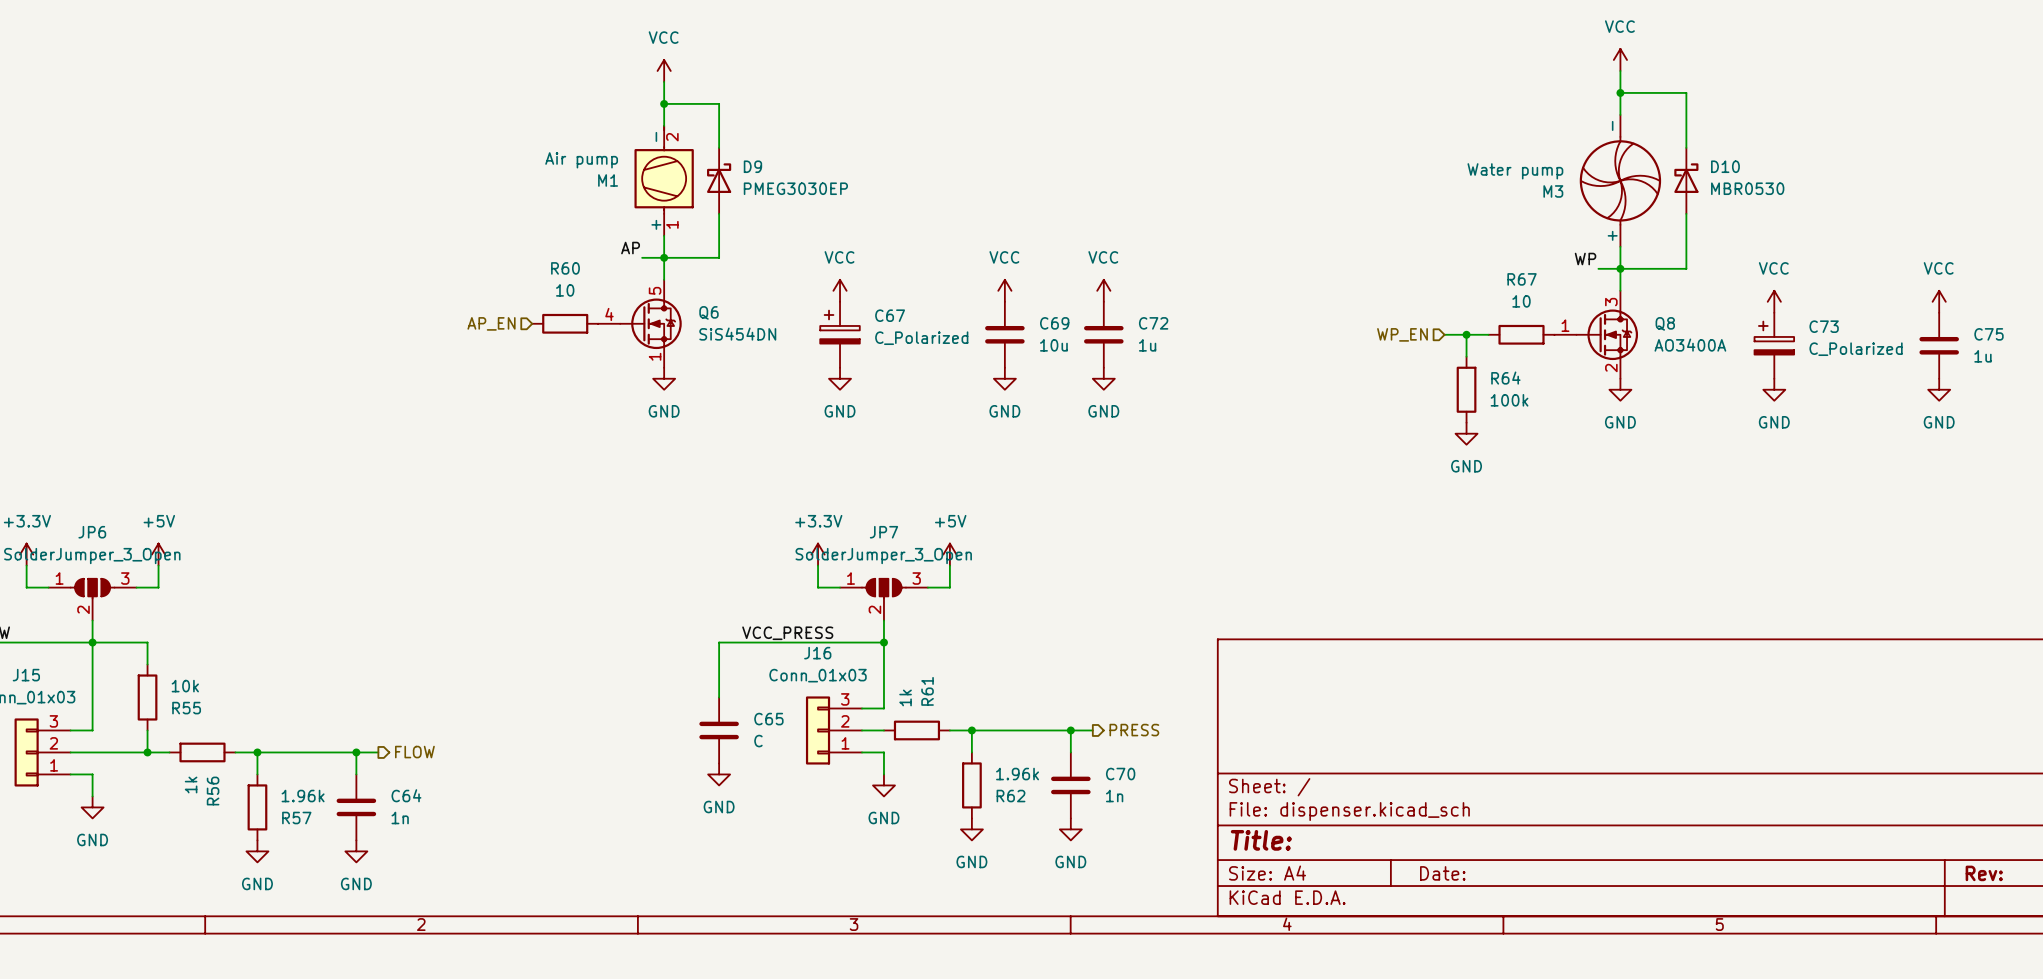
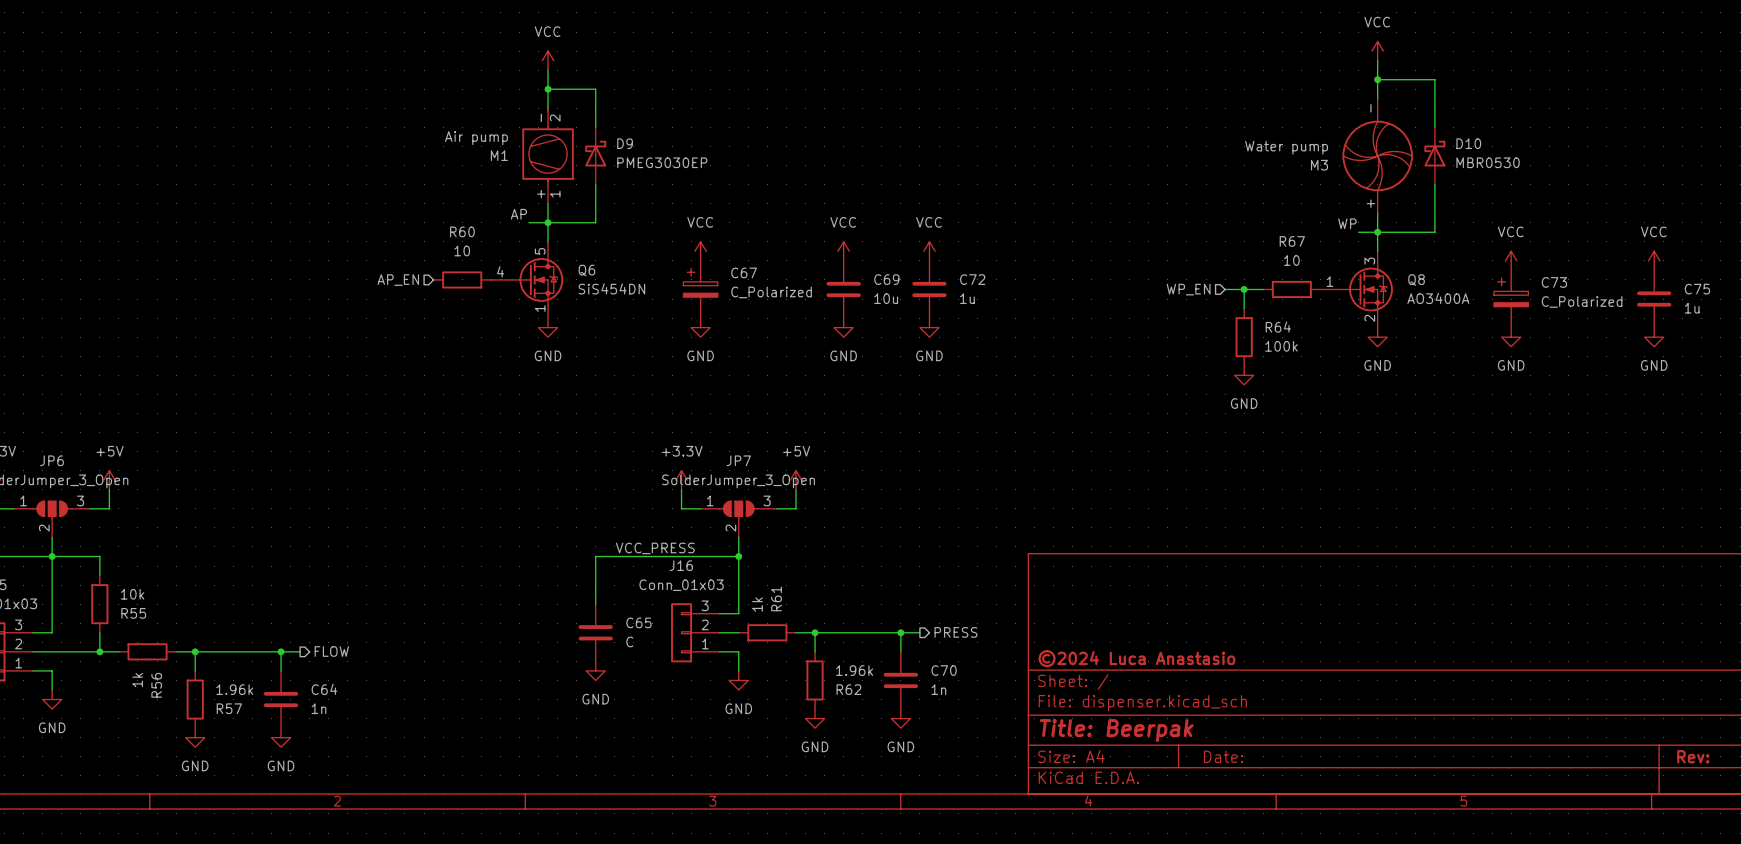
title block: none -> ©2024 Luca Anastasio (1136, 658)
title block: Title: (1261, 840) -> Title: Beerpak (1116, 730)

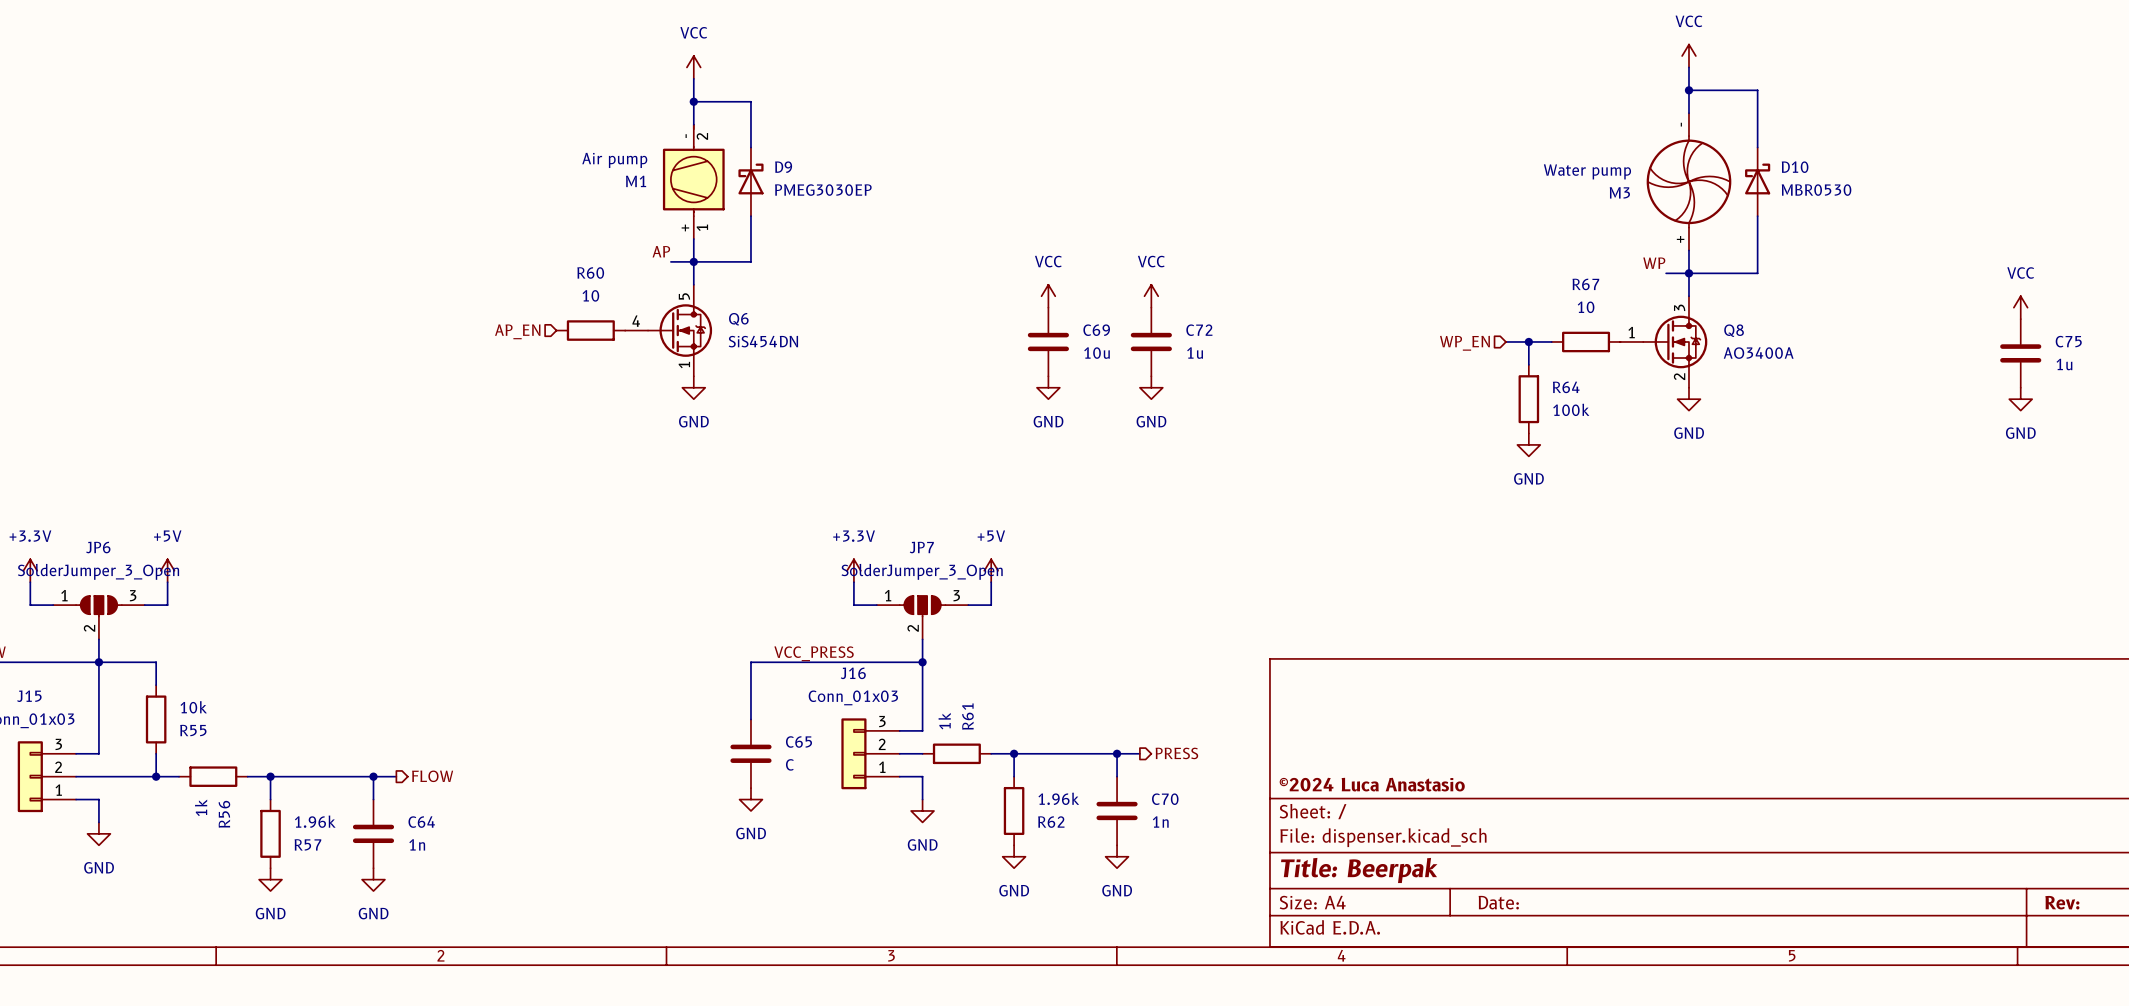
power symbol: VCC (700, 251) -> none
power symbol: VCC (1511, 260) -> none
C67: C_Polarized (700, 289) -> none
C73: C_Polarized (1511, 299) -> none
power symbol: GND (700, 327) -> none
power symbol: GND (1511, 337) -> none

